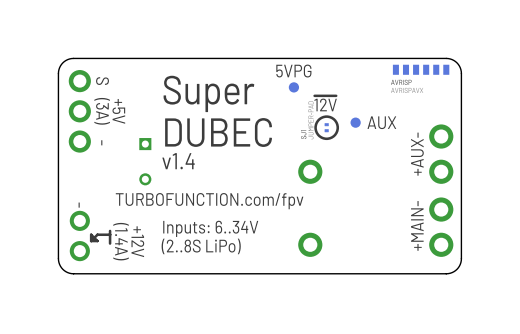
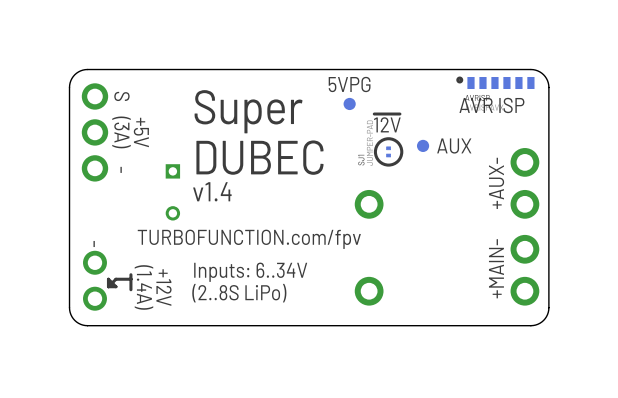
drawing: none -> [456, 76, 464, 84]
text: none -> AVR ISP (491, 105)

